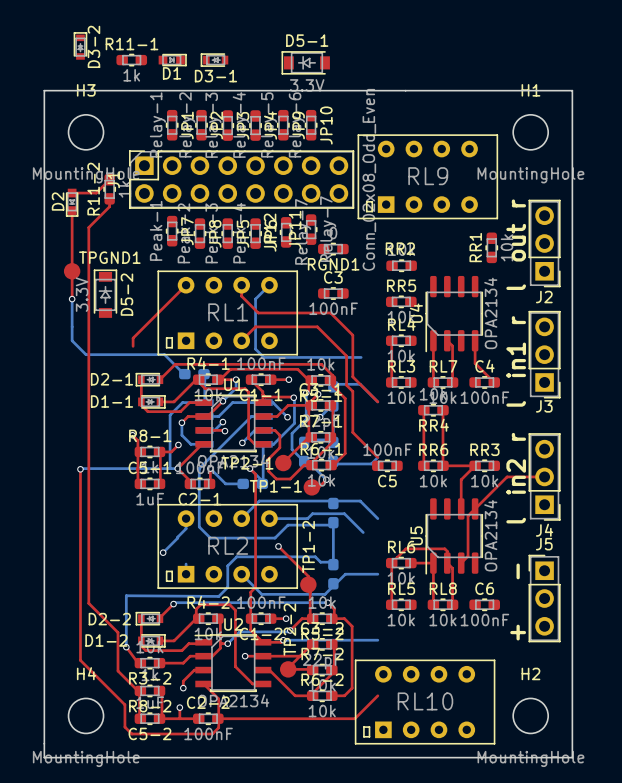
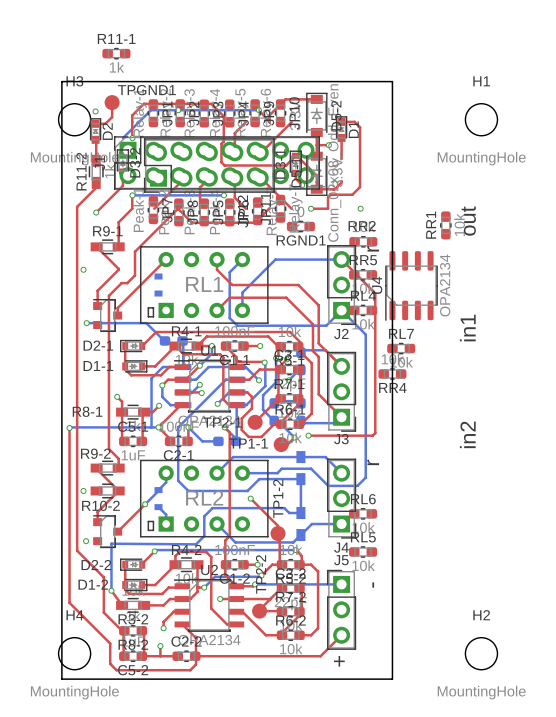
D3-2 position: (80, 46) -> (122, 161)
D1 rotation: 0° (172, 60) -> 90° counterclockwise (341, 129)
D1 position: (172, 60) -> (341, 129)
D3-1 rotation: 0° (214, 60) -> 90° clockwise (295, 163)
D3-1 position: (214, 60) -> (295, 163)
D5-1 rotation: 0° (305, 62) -> 90° counterclockwise (316, 173)
D5-1 position: (305, 62) -> (316, 173)
board edge: (72, 90) (44, 90) (44, 757) (572, 757) (572, 90) (433, 90) -> (61, 81) (61, 679) (392, 679) (392, 81)
top track: none -> (316, 99) (285, 99) (269, 115) (269, 122) (258, 110)
top track: none -> (112, 102) (112, 117) (105, 123) (92, 123)
via: none -> (178, 110)
bottom track: none -> (258, 110) (150, 110) (122, 138)
via: none -> (258, 110)
via: none -> (95, 111)
top track: none -> (341, 121) (354, 121) (360, 127) (360, 187) (352, 194) (330, 194) (328, 197) (328, 208) (311, 208)
top track: none -> (245, 122) (234, 133) (234, 152)
top track: none -> (291, 122) (261, 152)
top track: none -> (316, 132) (316, 155)
top track: none -> (132, 138) (132, 115) (143, 103) (211, 103) (223, 116) (221, 162) (224, 165) (286, 165) (296, 155) (316, 175) (316, 189) (334, 189) (341, 180)
via: none -> (132, 138)
top track: none -> (341, 137) (341, 158)
top track: none -> (95, 139) (96, 160)
top track: none -> (316, 145) (328, 145)
via: none -> (328, 145)
R11-2 footprint: [103, 173, 116, 205] -> [88, 154, 104, 189]
RL9: (427, 176) -> none
top track: (109, 179) (96, 193) (72, 193) -> none
part: none -> (209, 165)
top track: none -> (122, 171) (122, 185) (96, 212)
top track: none -> (295, 172) (295, 178) (302, 185)
top track: none -> (209, 178) (200, 187) (200, 208)
top track: none -> (234, 178) (234, 197) (245, 208)
top track: none -> (261, 178) (291, 208)
top track: none -> (183, 179) (154, 208)
D2 rotation: 0° (72, 202) -> 180° (95, 131)
D2 position: (72, 202) -> (95, 131)
via: none -> (302, 185)
text: r (518, 203) -> none
top track: (72, 210) (72, 299) -> none
top track: none -> (132, 195) (132, 208) (118, 222) (118, 246)
bottom track: none -> (132, 195) (223, 195)
via: none -> (132, 195)
via: none -> (223, 195)
top track: none -> (269, 208) (255, 222) (192, 222) (178, 208) (135, 251) (135, 275) (127, 283) (121, 283) (108, 295) (108, 449) (118, 458) (118, 468)
via: none -> (311, 208)
via: none -> (360, 208)
via: none -> (96, 212)
J2 position: (544, 243) -> (341, 285)
TPGND1 position: (72, 271) -> (112, 102)
top track: none -> (96, 246) (118, 268) (97, 290) (97, 306)
R9-1: none -> (107, 246)
text: none -> r (373, 248)
top track: none -> (341, 259) (375, 293) (375, 433) (372, 435) (308, 435)
bottom track: none -> (341, 259) (275, 259) (242, 292) (242, 310)
text: l (516, 287) -> none
D5-2 position: (105, 293) -> (316, 114)
C3: 100nF (333, 293) -> none
bottom track: (72, 299) (72, 340) (86, 354) (99, 354) -> none
via position: (72, 299) -> (83, 269)
part: none -> (158, 285)
text: r (518, 320) -> none
top track: (391, 340) (391, 382) -> none
top track: (433, 340) (433, 382) -> none
top track: (447, 340) (452, 346) (452, 382) -> none
top track: (475, 340) (475, 363) (494, 382) -> none
part: none -> (107, 315)
via: none -> (86, 323)
J3 position: (544, 354) -> (341, 391)
bottom track: none -> (326, 325) (341, 310) (365, 334) (365, 477) (357, 485) (328, 485)
R4-1 footprint: [192, 373, 224, 386] -> [169, 338, 204, 354]
RL3: 10k (401, 382) -> none
C4: 100nF (484, 382) -> none
text: l (516, 403) -> none
top track: (423, 410) (423, 465) -> none
top track: (442, 410) (442, 465) (475, 465) (461, 479) (461, 508) -> none
R8-1 name position: R8-1 (150, 435) -> R8-1 (87, 411)
text: r (518, 436) -> none
R8-1 footprint: [134, 445, 166, 459] -> [116, 404, 151, 420]
C5: 100nF (387, 465) -> none
RR6: 10k (433, 465) -> none
RR3: 10k (484, 465) -> none
top track: (544, 476) (507, 476) (468, 515) (468, 556) (461, 563) -> none
J4 position: (544, 476) -> (341, 498)
via: none -> (308, 435)
part footprint: [328, 497, 339, 529] -> [296, 451, 306, 486]
text: none -> r (373, 462)
top track: none -> (96, 468) (118, 490) (97, 511) (97, 522)
R9-2: none -> (107, 468)
text: l (516, 520) -> none
U5: OPA2134 (454, 536) -> none
via: none -> (83, 490)
R10-2: none -> (107, 490)
part: none -> (158, 498)
top track: none -> (145, 504) (117, 531)
bottom track: none -> (158, 507) (166, 514)
part footprint: [328, 558, 339, 590] -> [296, 507, 306, 542]
top track: (410, 563) (433, 563) (433, 604) -> none
text position: - (518, 571) -> - (373, 585)
part: none -> (107, 531)
via: none -> (86, 541)
J5 position: (544, 598) -> (341, 609)
top track: (391, 604) (391, 563) (405, 548) (444, 548) (447, 551) (447, 563) (452, 568) (452, 604) -> none
RL8: 10k (442, 604) -> none
C6: 100nF (484, 604) -> none
R4-2 footprint: [192, 612, 224, 625] -> [169, 557, 204, 573]
text position: + (518, 632) -> + (339, 661)
R3-2 footprint: [134, 656, 166, 670] -> [116, 597, 151, 613]
RL10: (425, 702) -> none
C2-2 value: 100nF (208, 733) -> none

